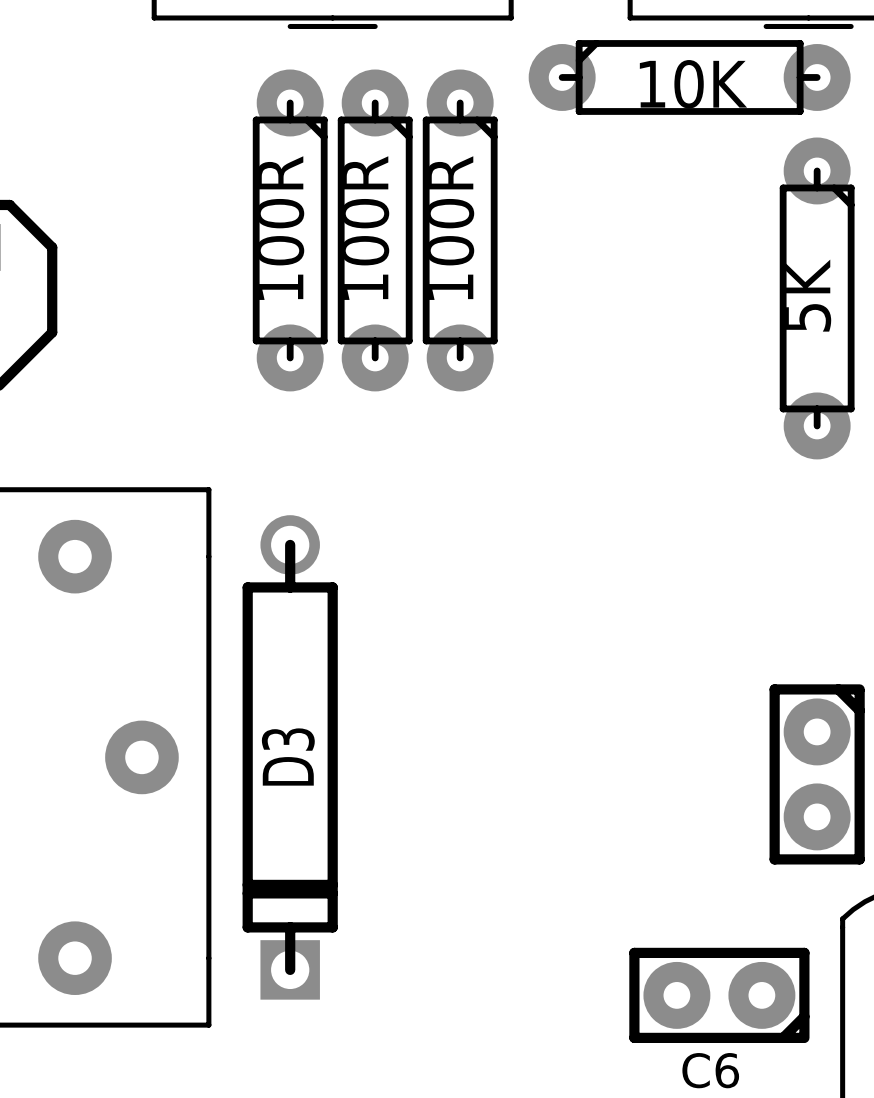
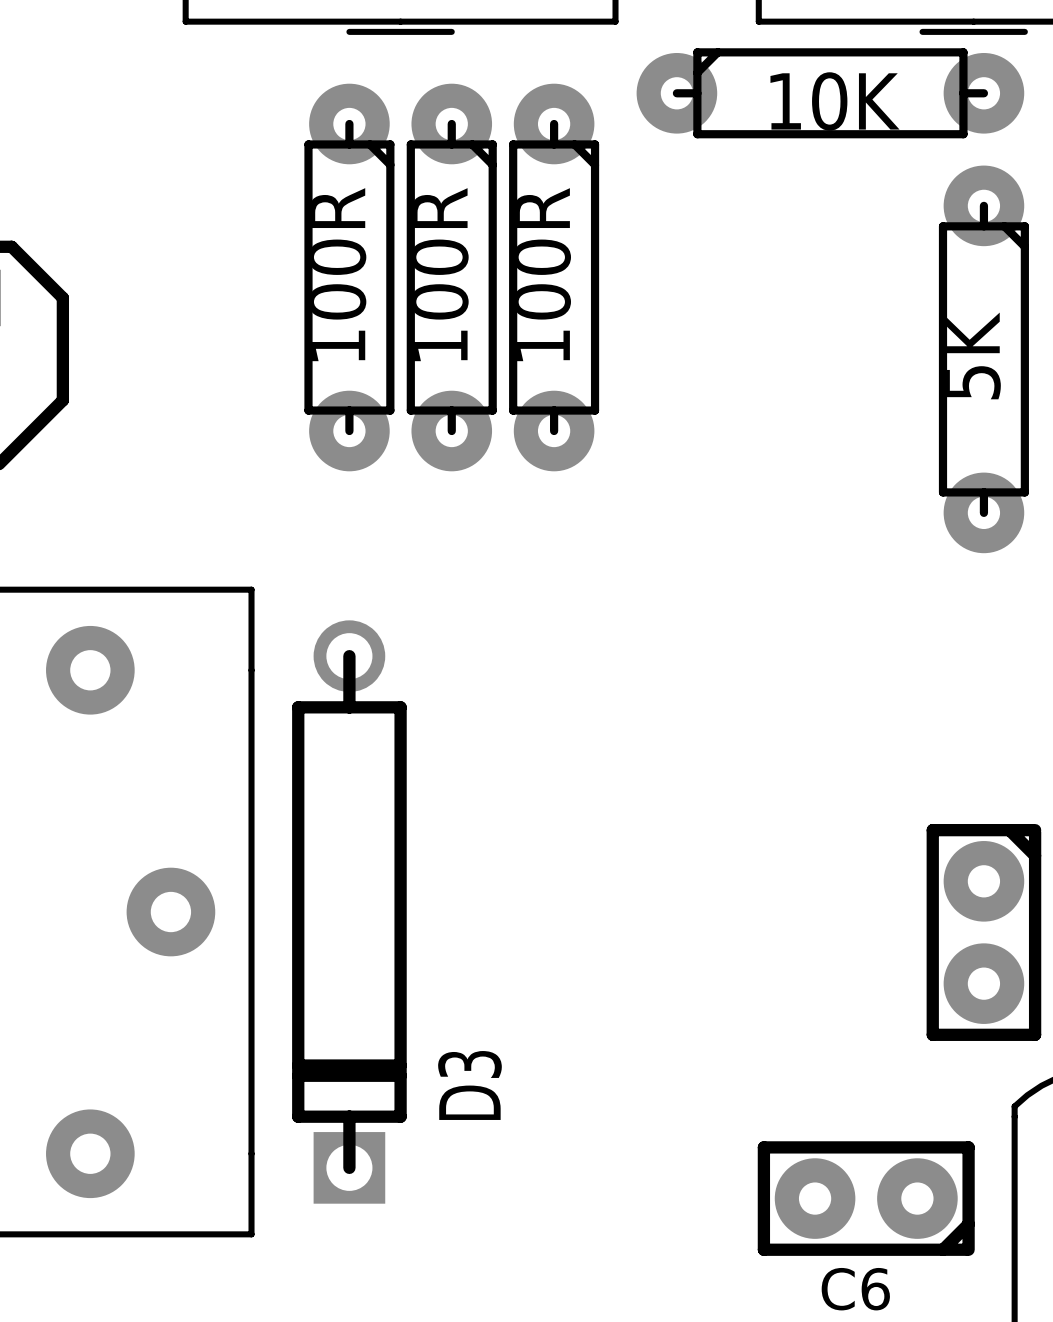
D3 name position: D3 (288, 757) -> D3 (469, 1085)

